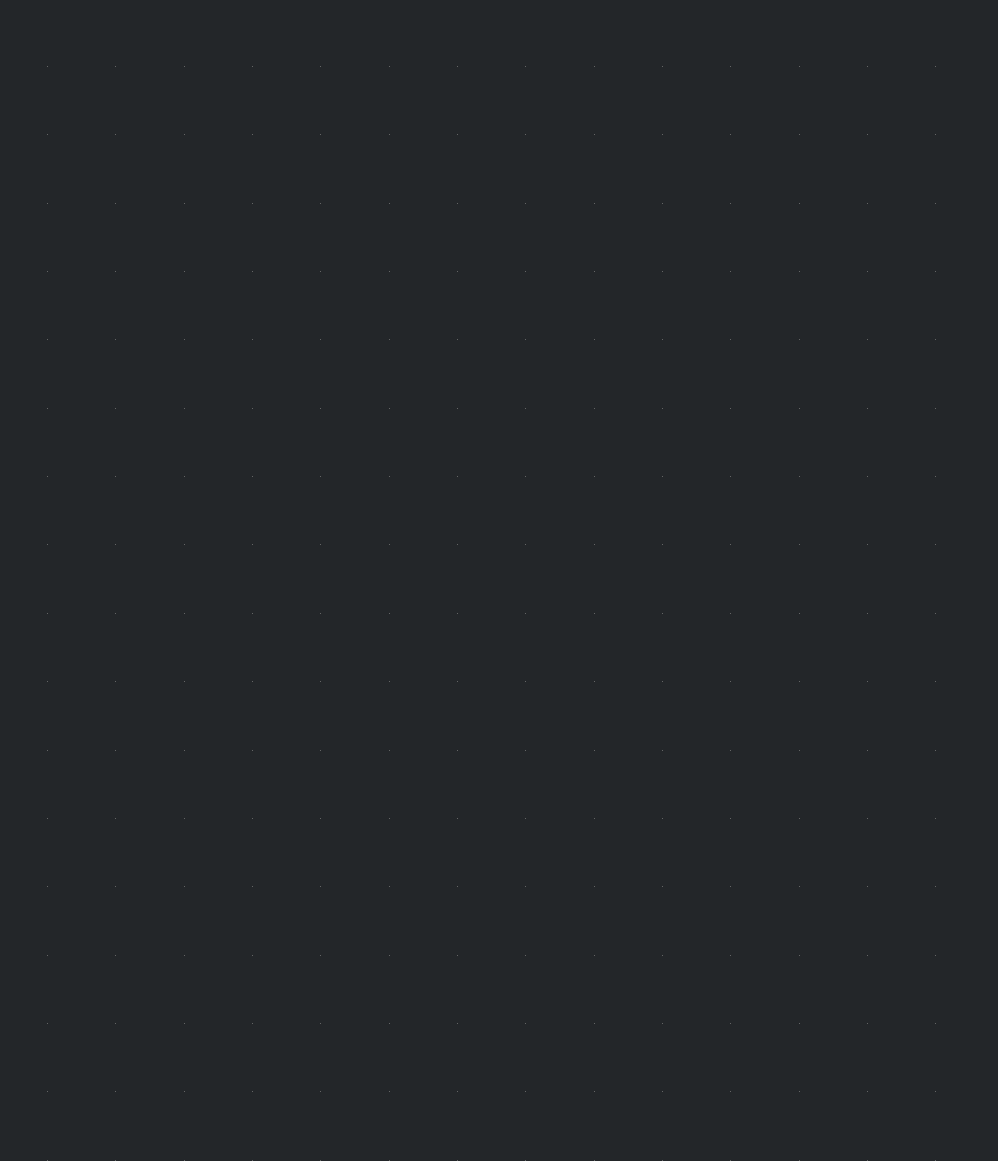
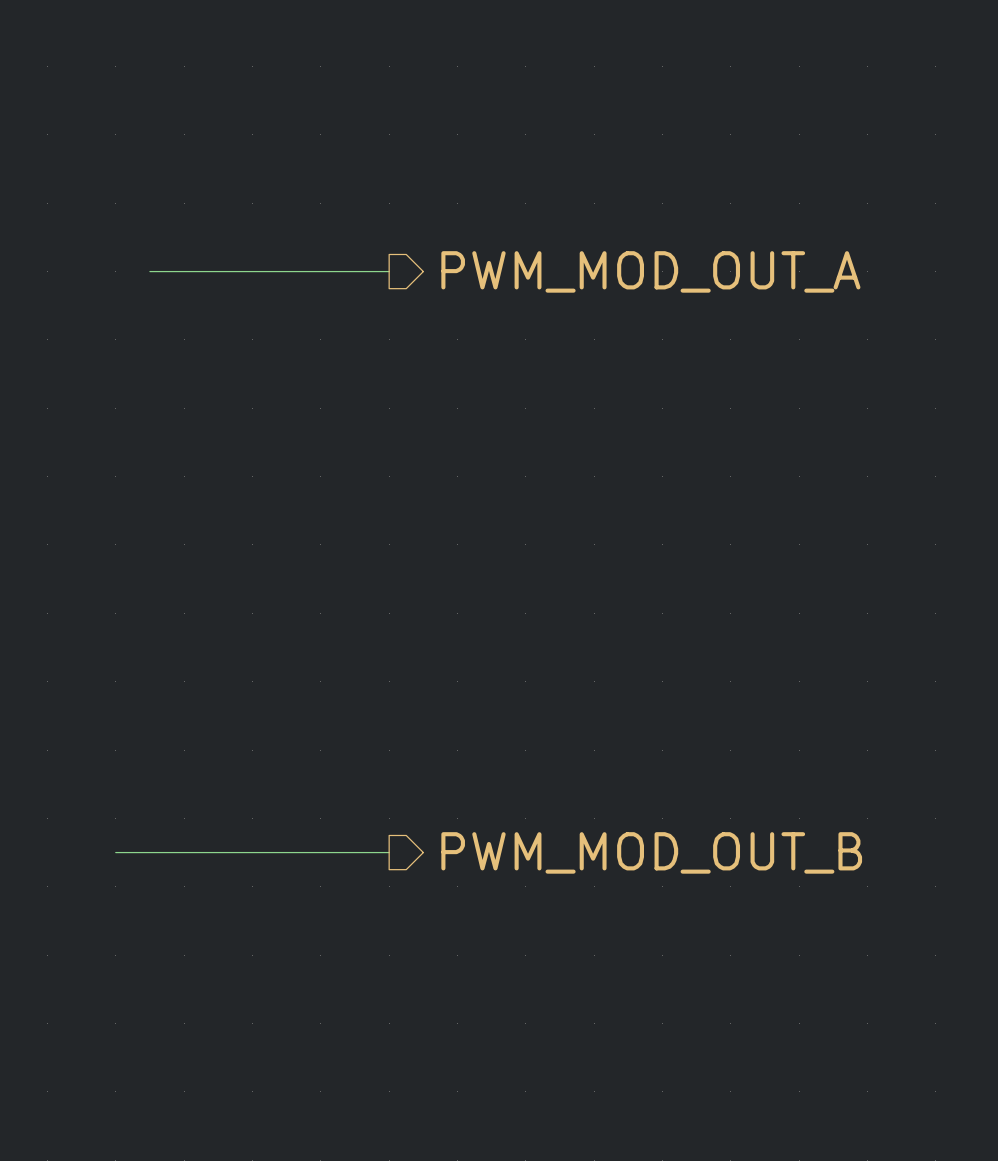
wire: none -> (149, 271) (389, 271)
hierarchical label: none -> PWM_MOD_OUT_A (650, 271)
wire: none -> (115, 852) (389, 852)
hierarchical label: none -> PWM_MOD_OUT_B (651, 852)

